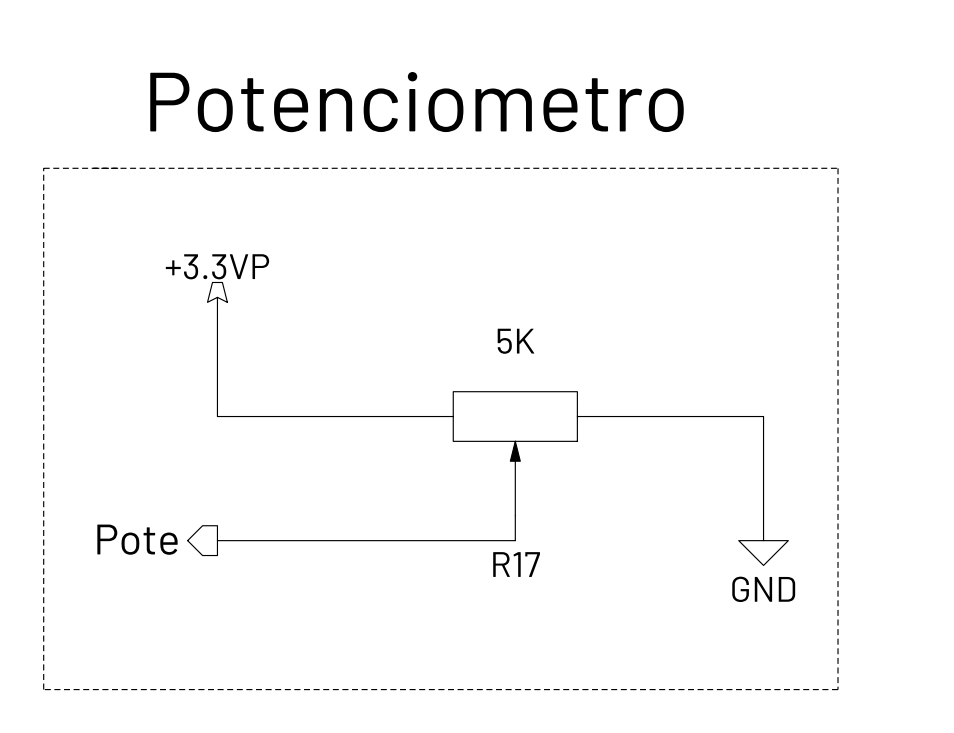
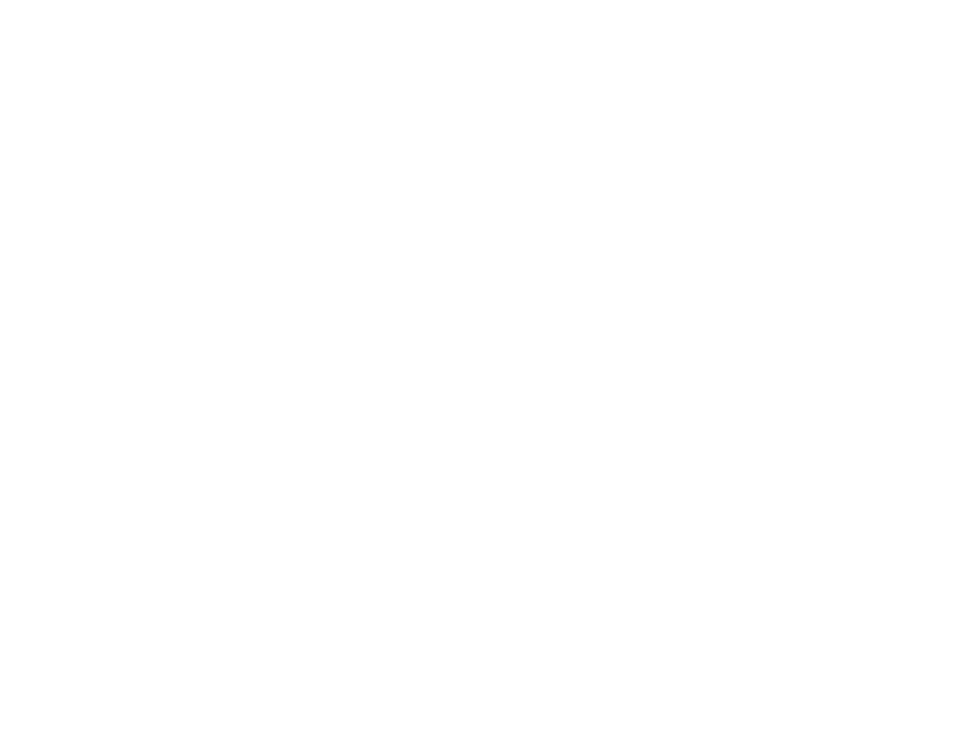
text: Potenciometro (417, 102) -> none
line: (43, 168) (838, 168) (838, 689) (43, 689) (43, 168) -> none
power symbol: +3.3VP (217, 299) -> none
wire: (217, 317) (217, 416) (366, 416) -> none
wire: (664, 416) (763, 416) (763, 515) -> none
R17: 5K (515, 453) -> none
wire: (515, 515) (515, 540) (217, 540) -> none
hierarchical label: Pote (137, 539) -> none
power symbol: GND (763, 540) -> none

